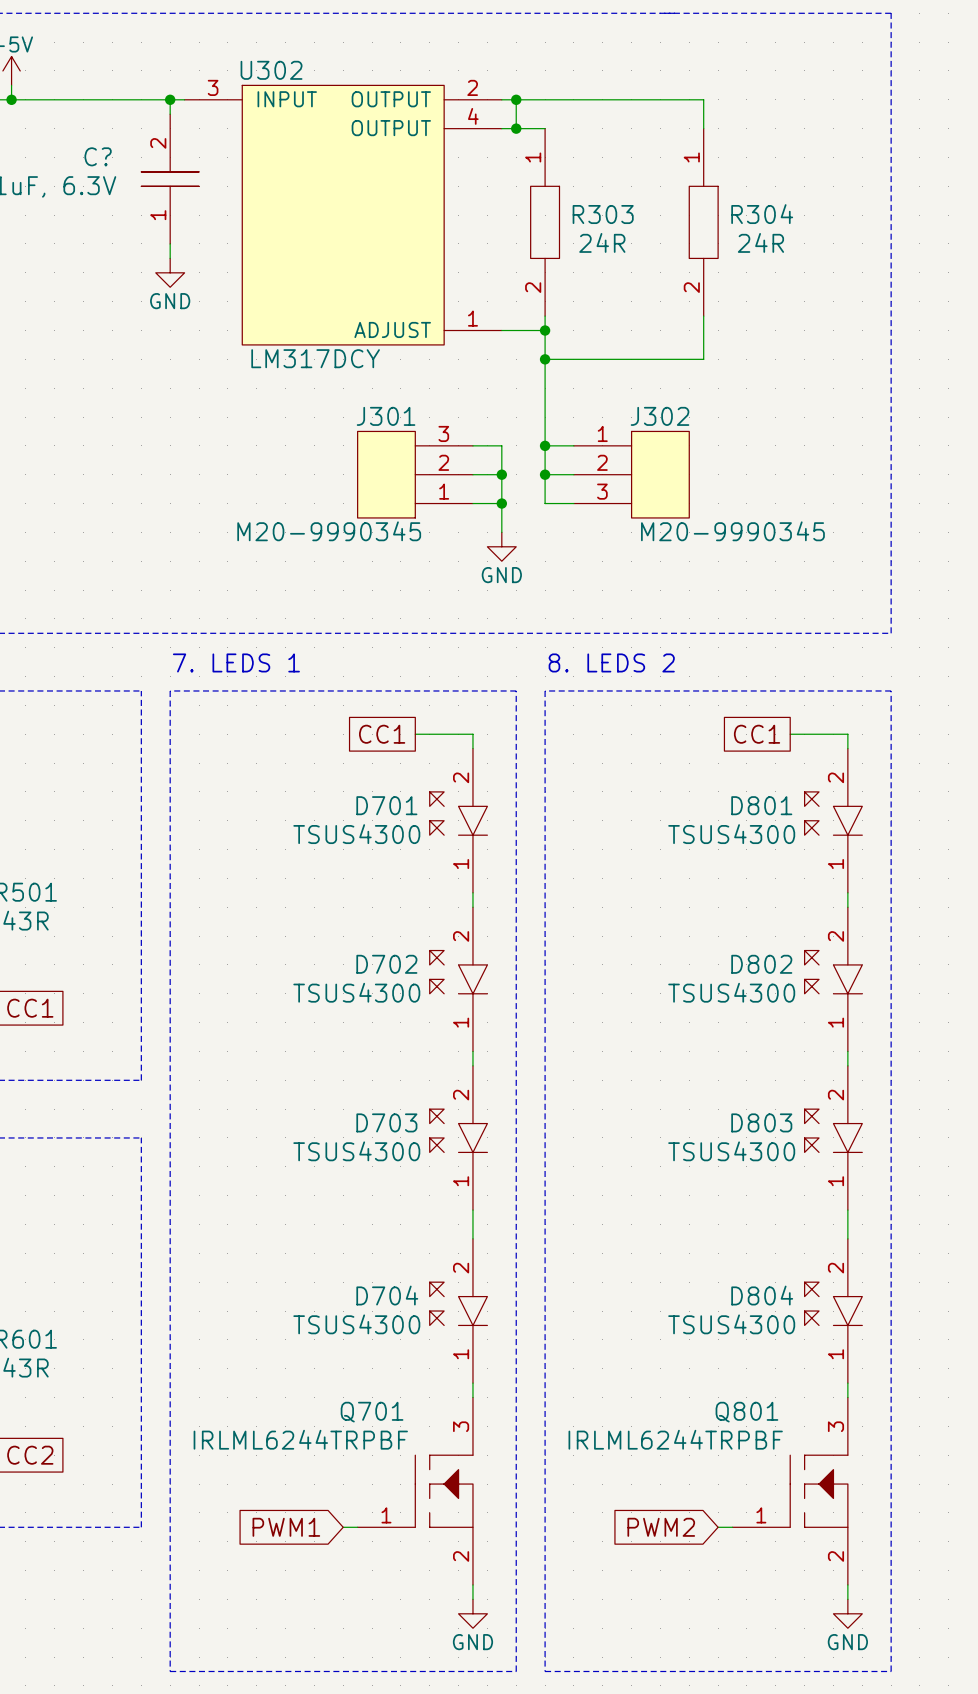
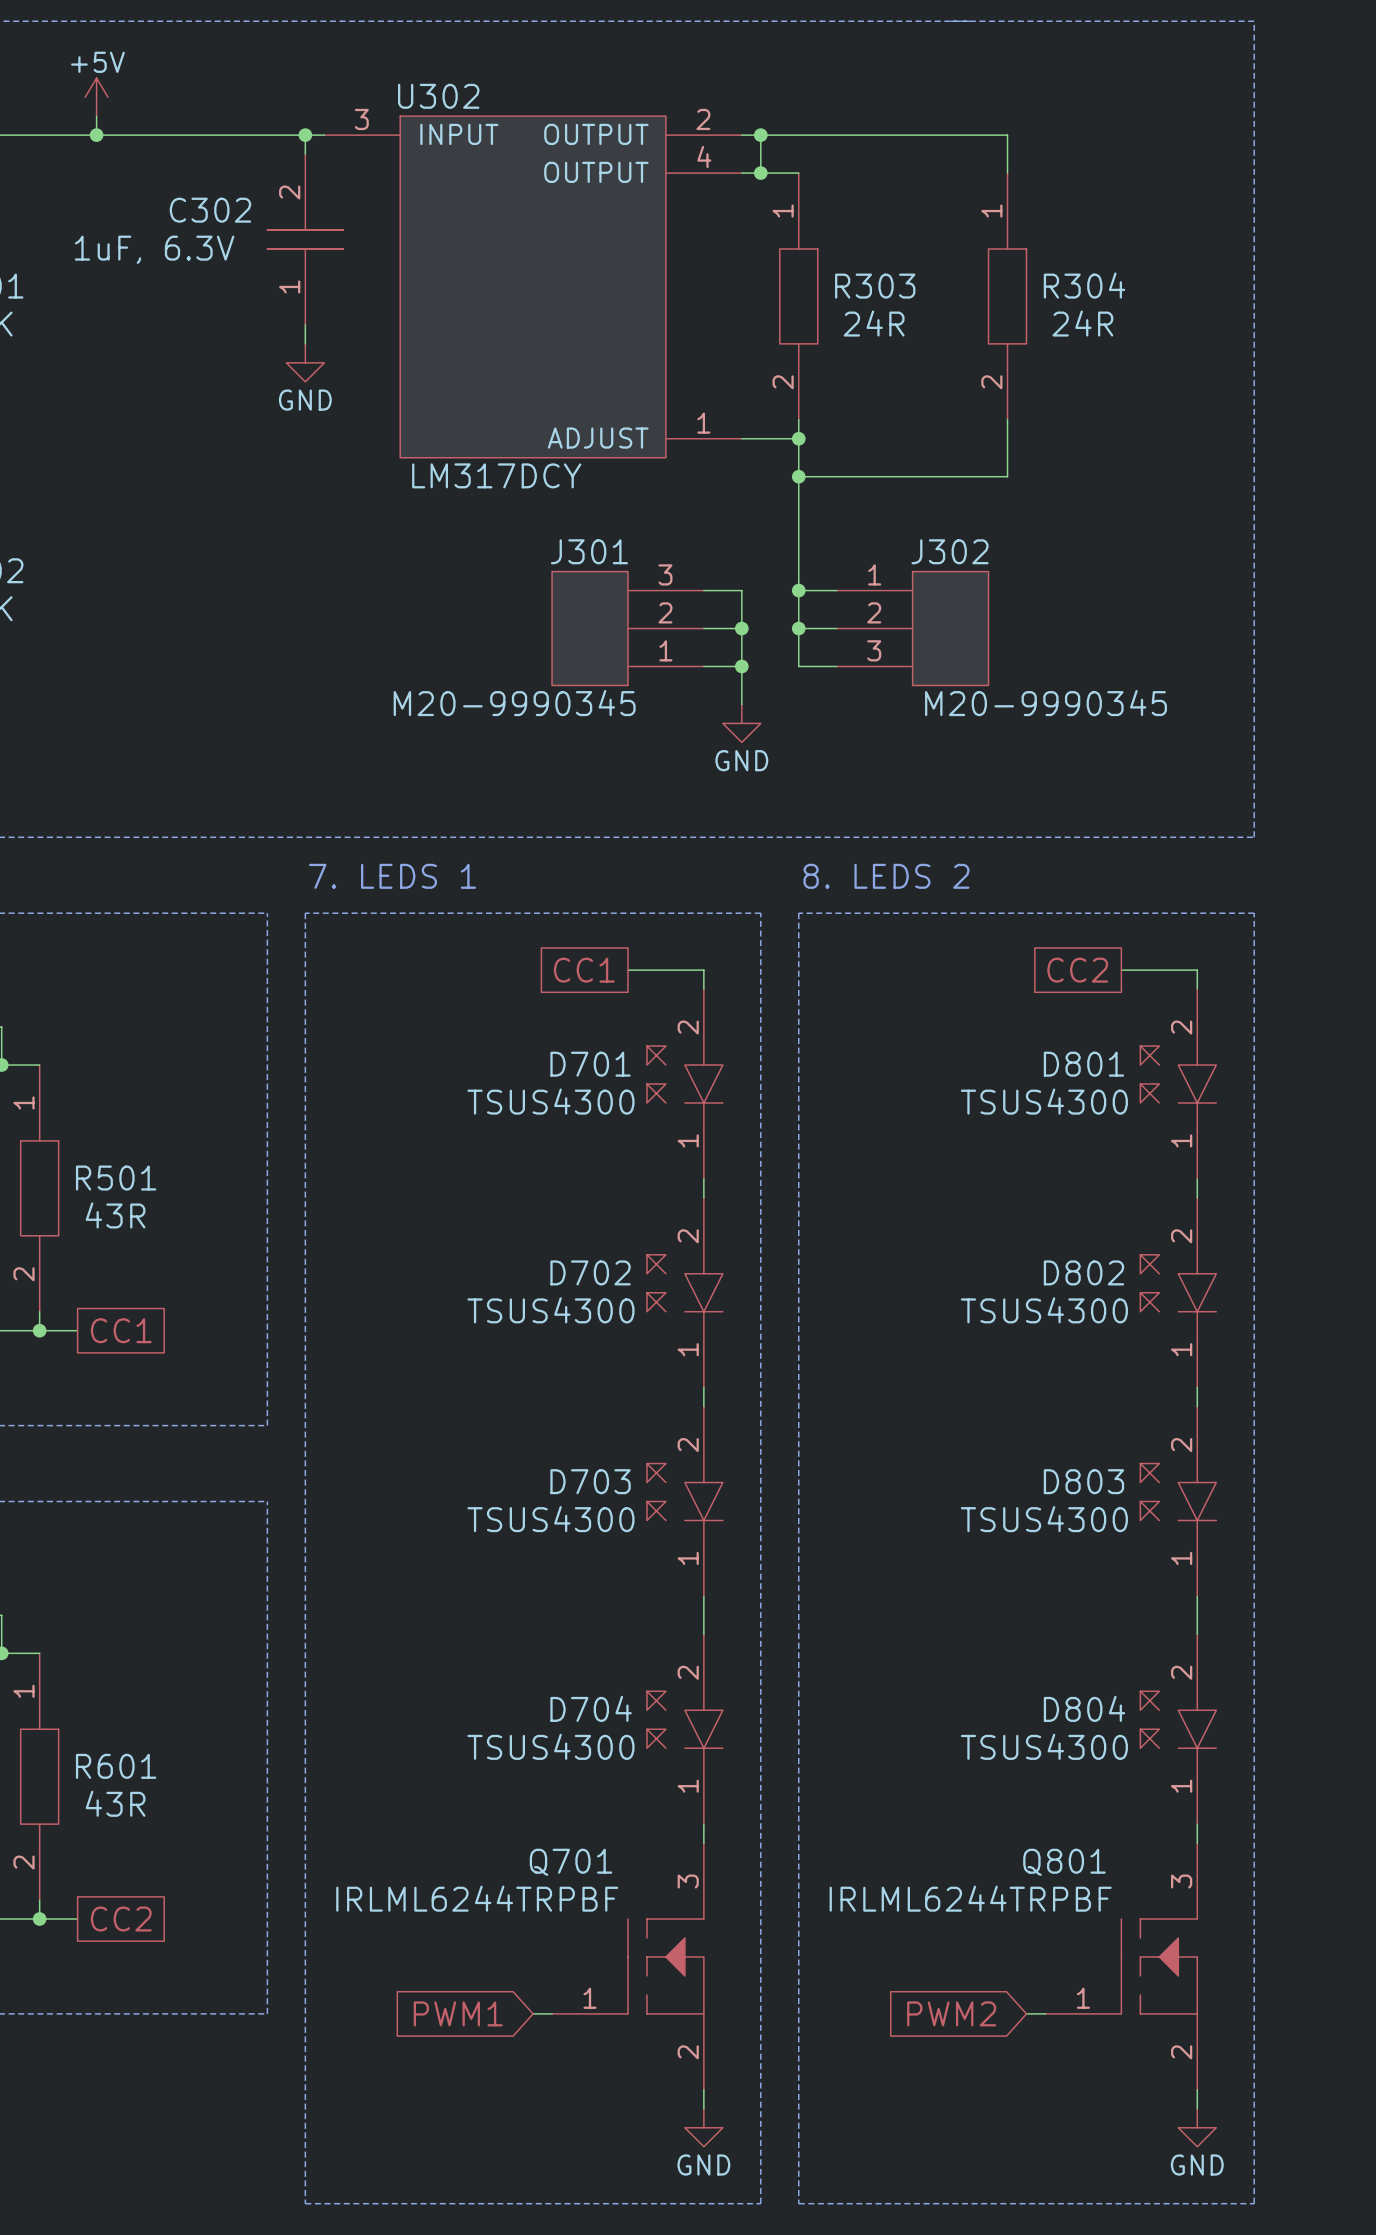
C? name: C? (98, 156) -> C302 (210, 210)
global label: CC1 (757, 734) -> CC2 (1077, 970)

